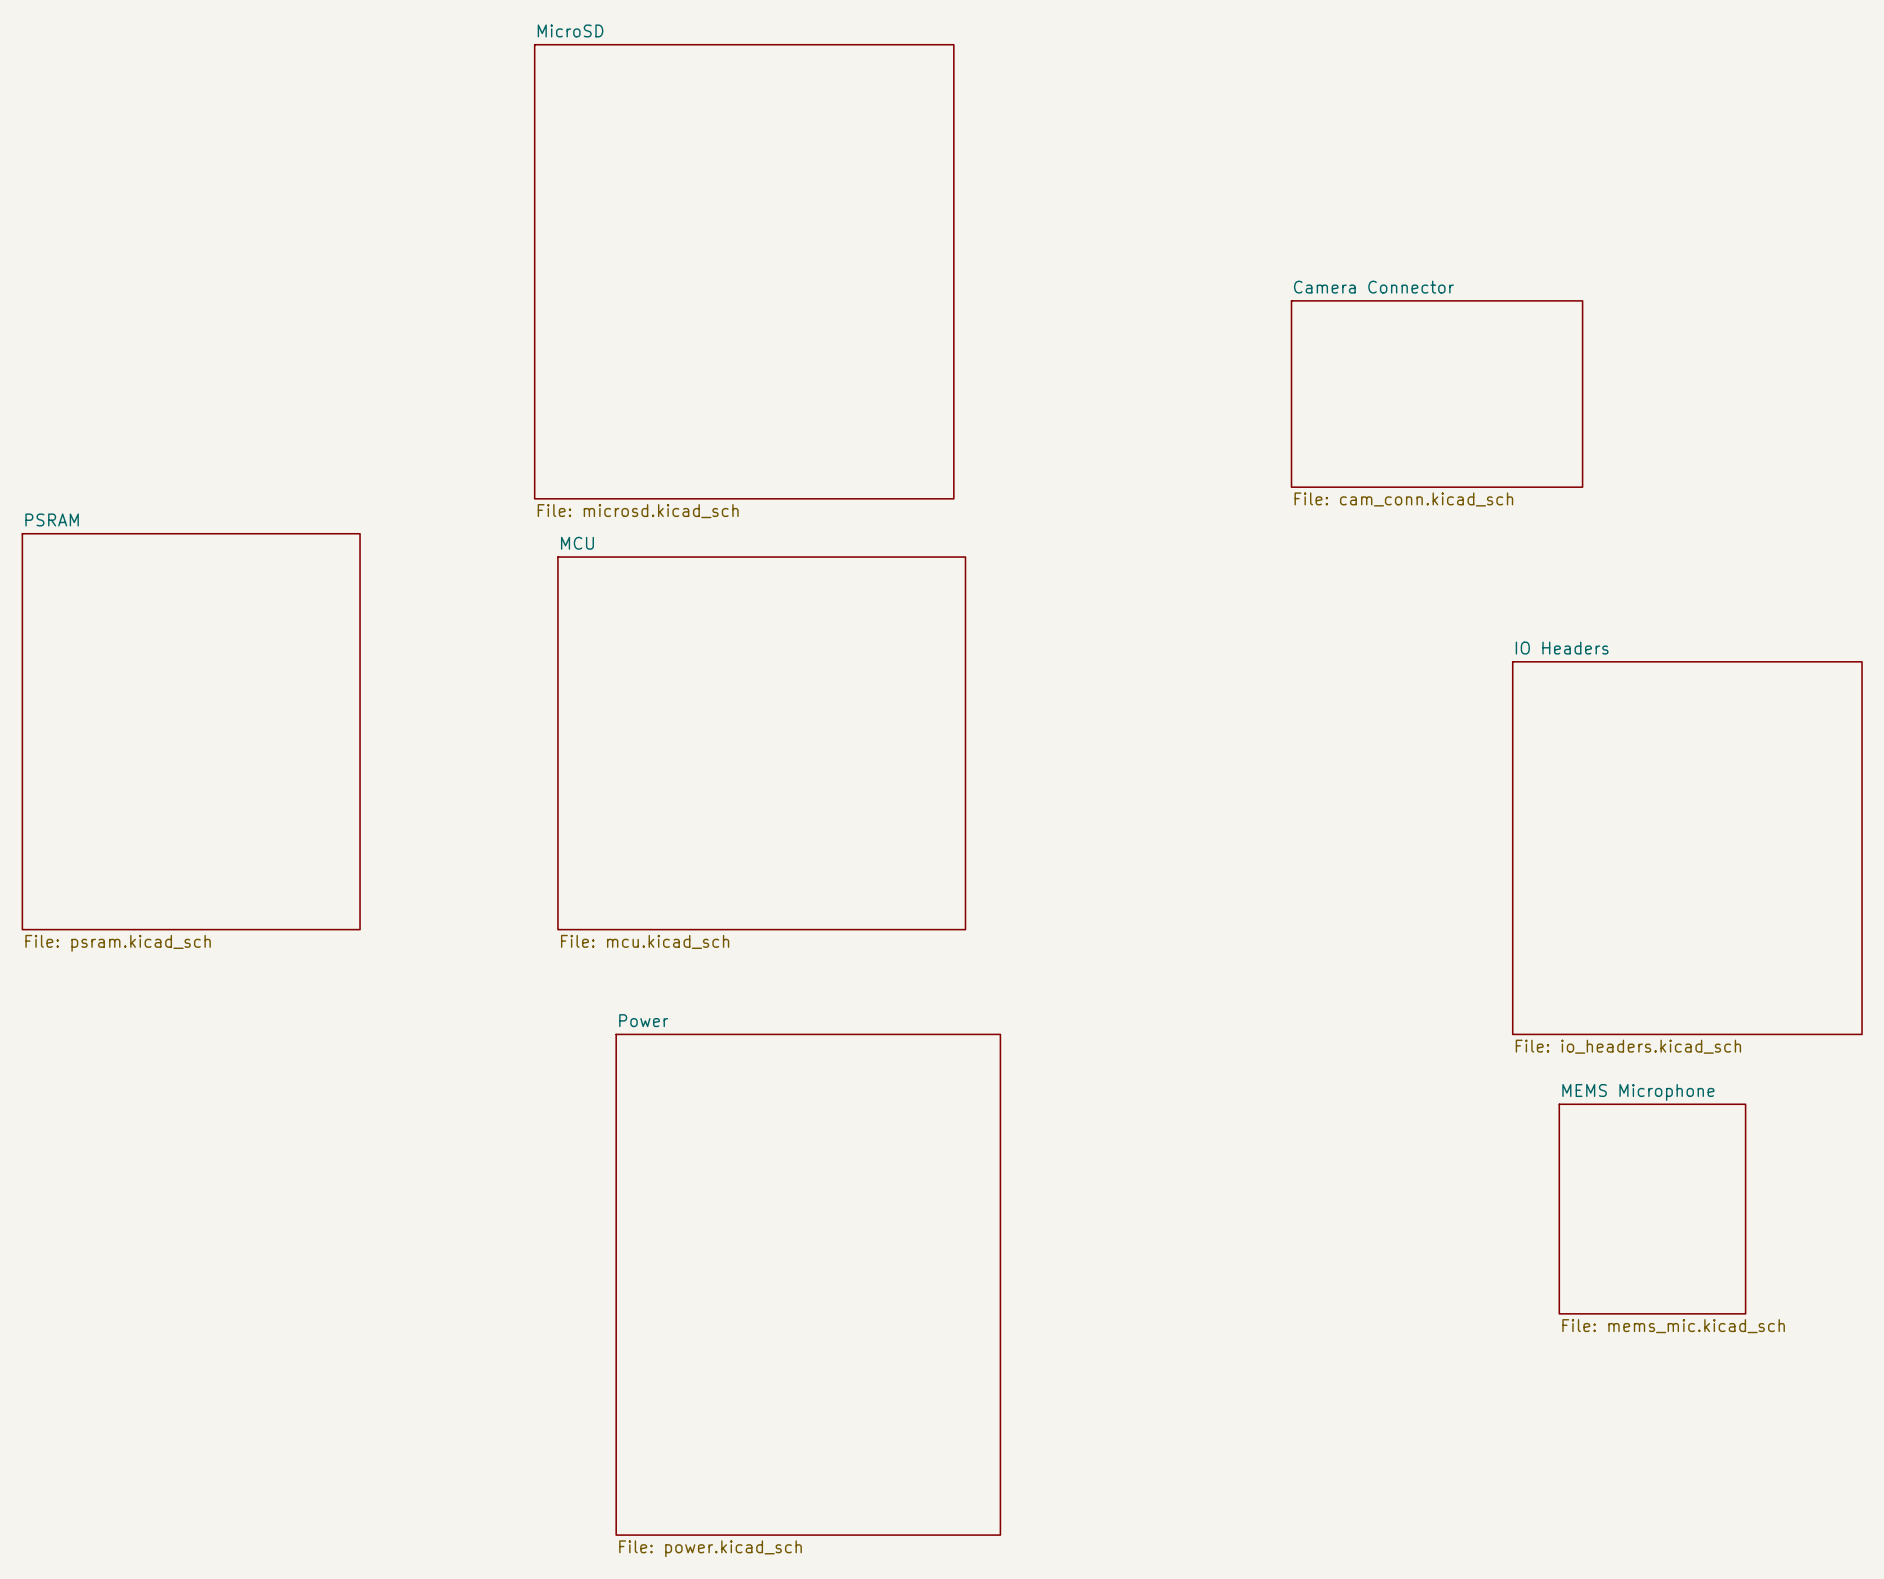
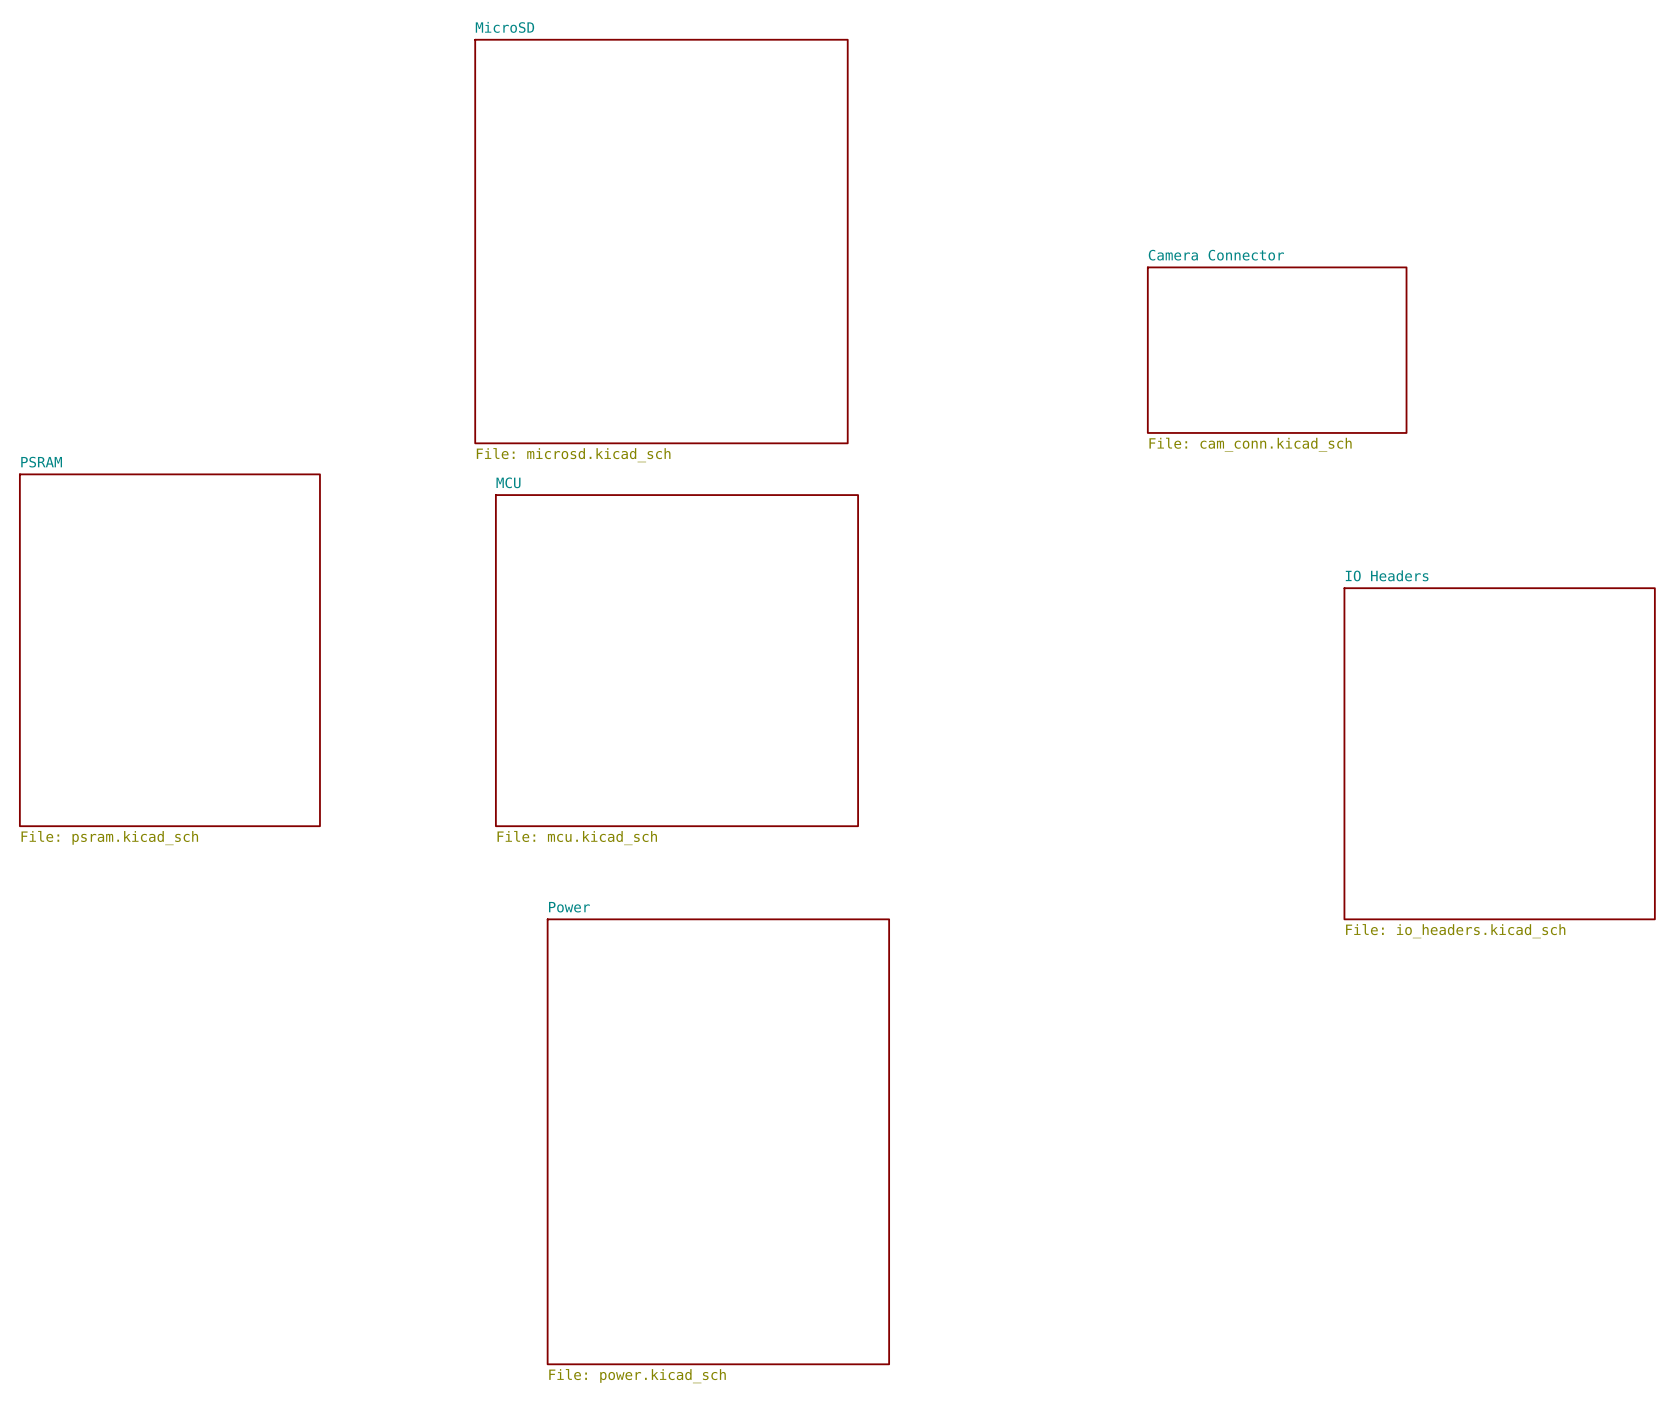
sheet MEMS Microphone: File: mems_mic.kicad_sch (1652, 1209) -> none

